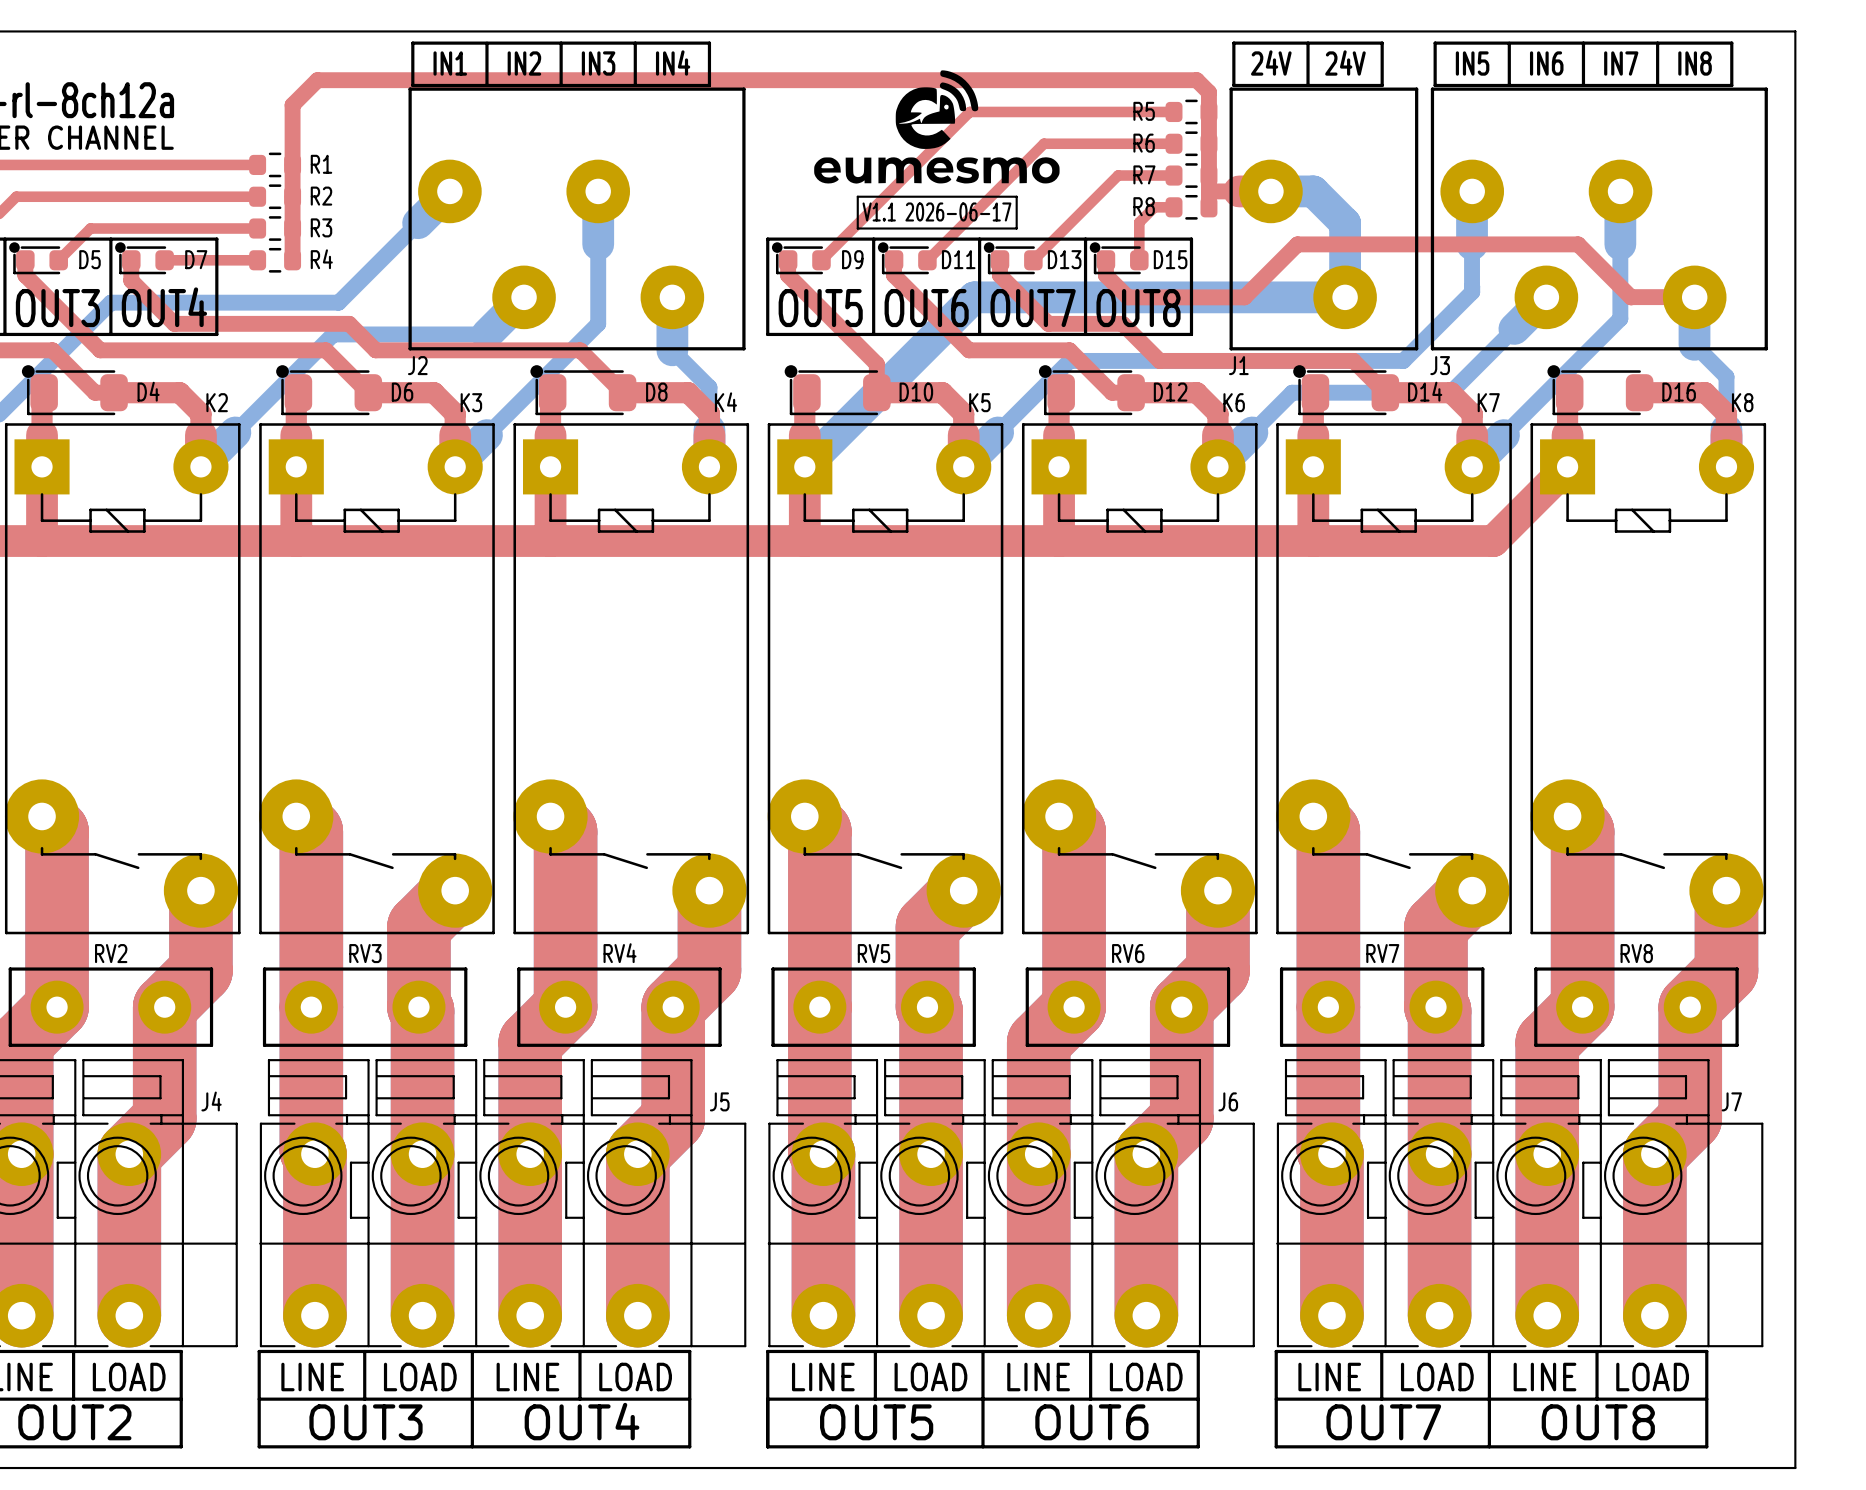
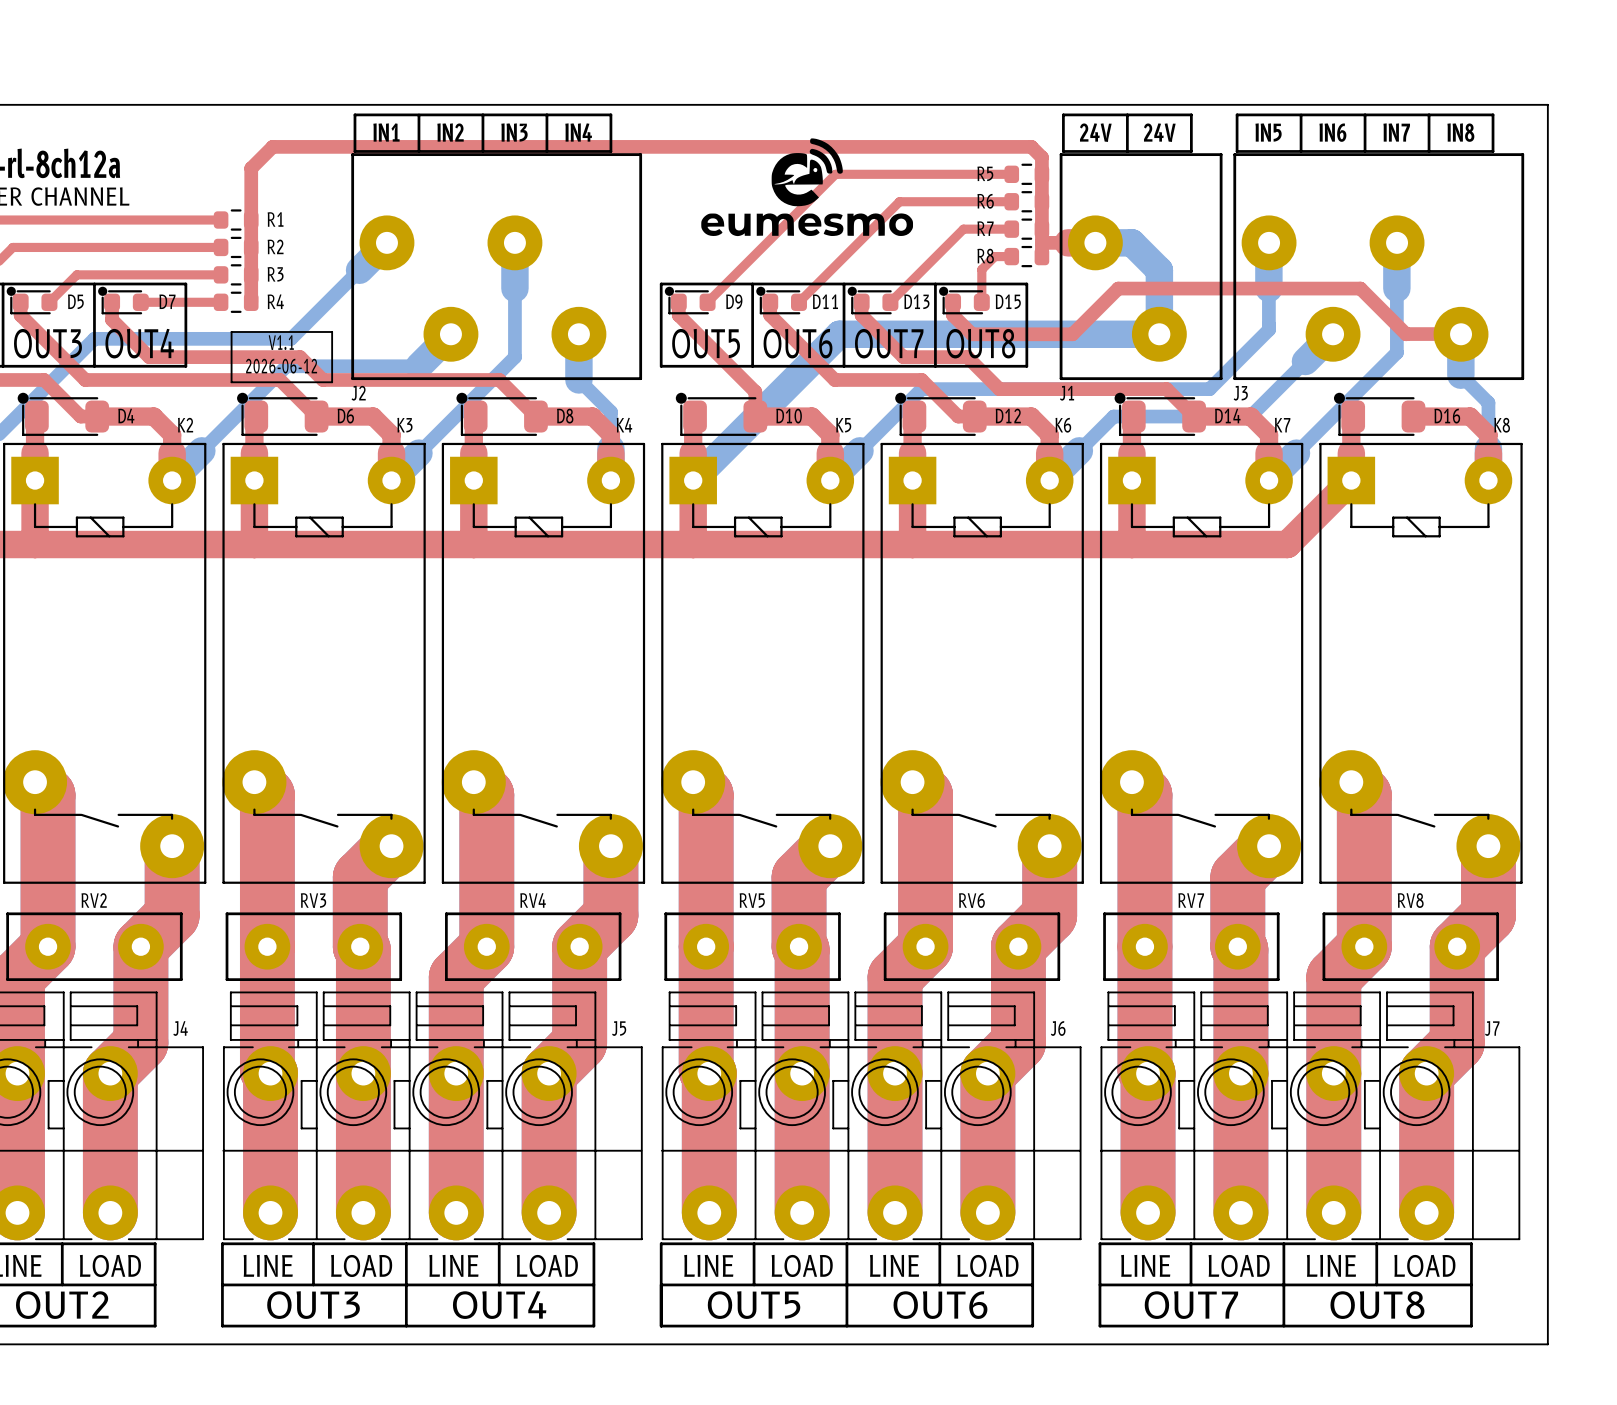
line: (857, 196) (1016, 196) (1016, 228) (857, 228) (857, 196) -> none
text: V1.1 2026-06-17 (936, 211) -> none
line: none -> (231, 331) (332, 331) (332, 382) (231, 382) (231, 331)
text: none -> V1.1 (281, 342)
text: none -> 2026-06-12 (281, 366)

